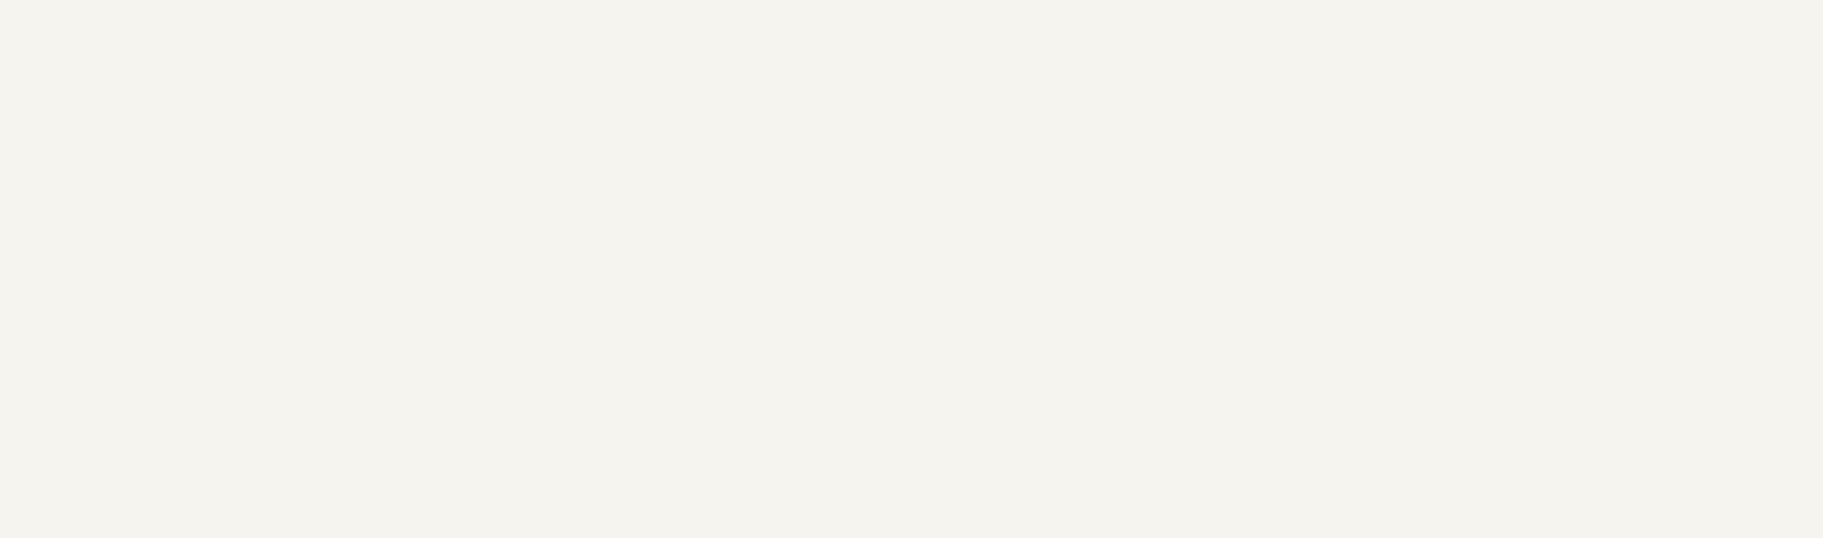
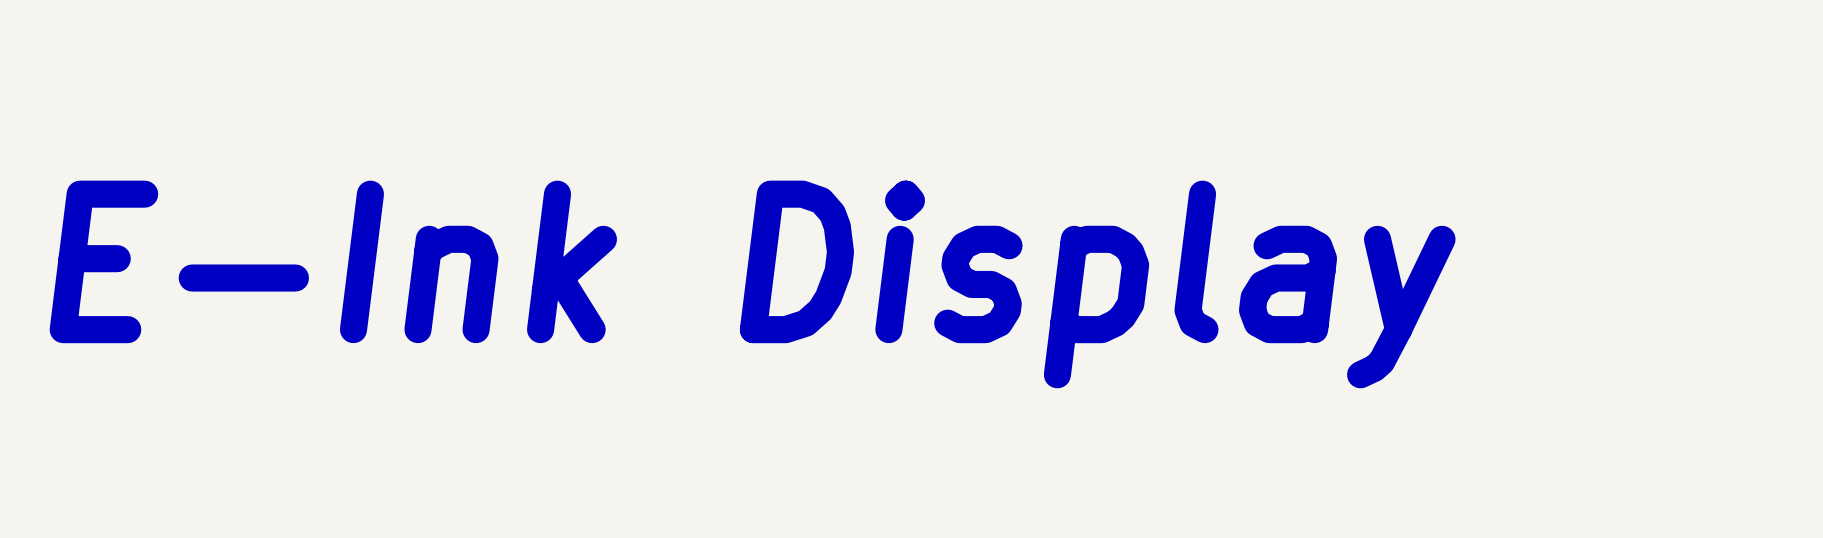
text: none -> E-Ink Display (752, 284)

